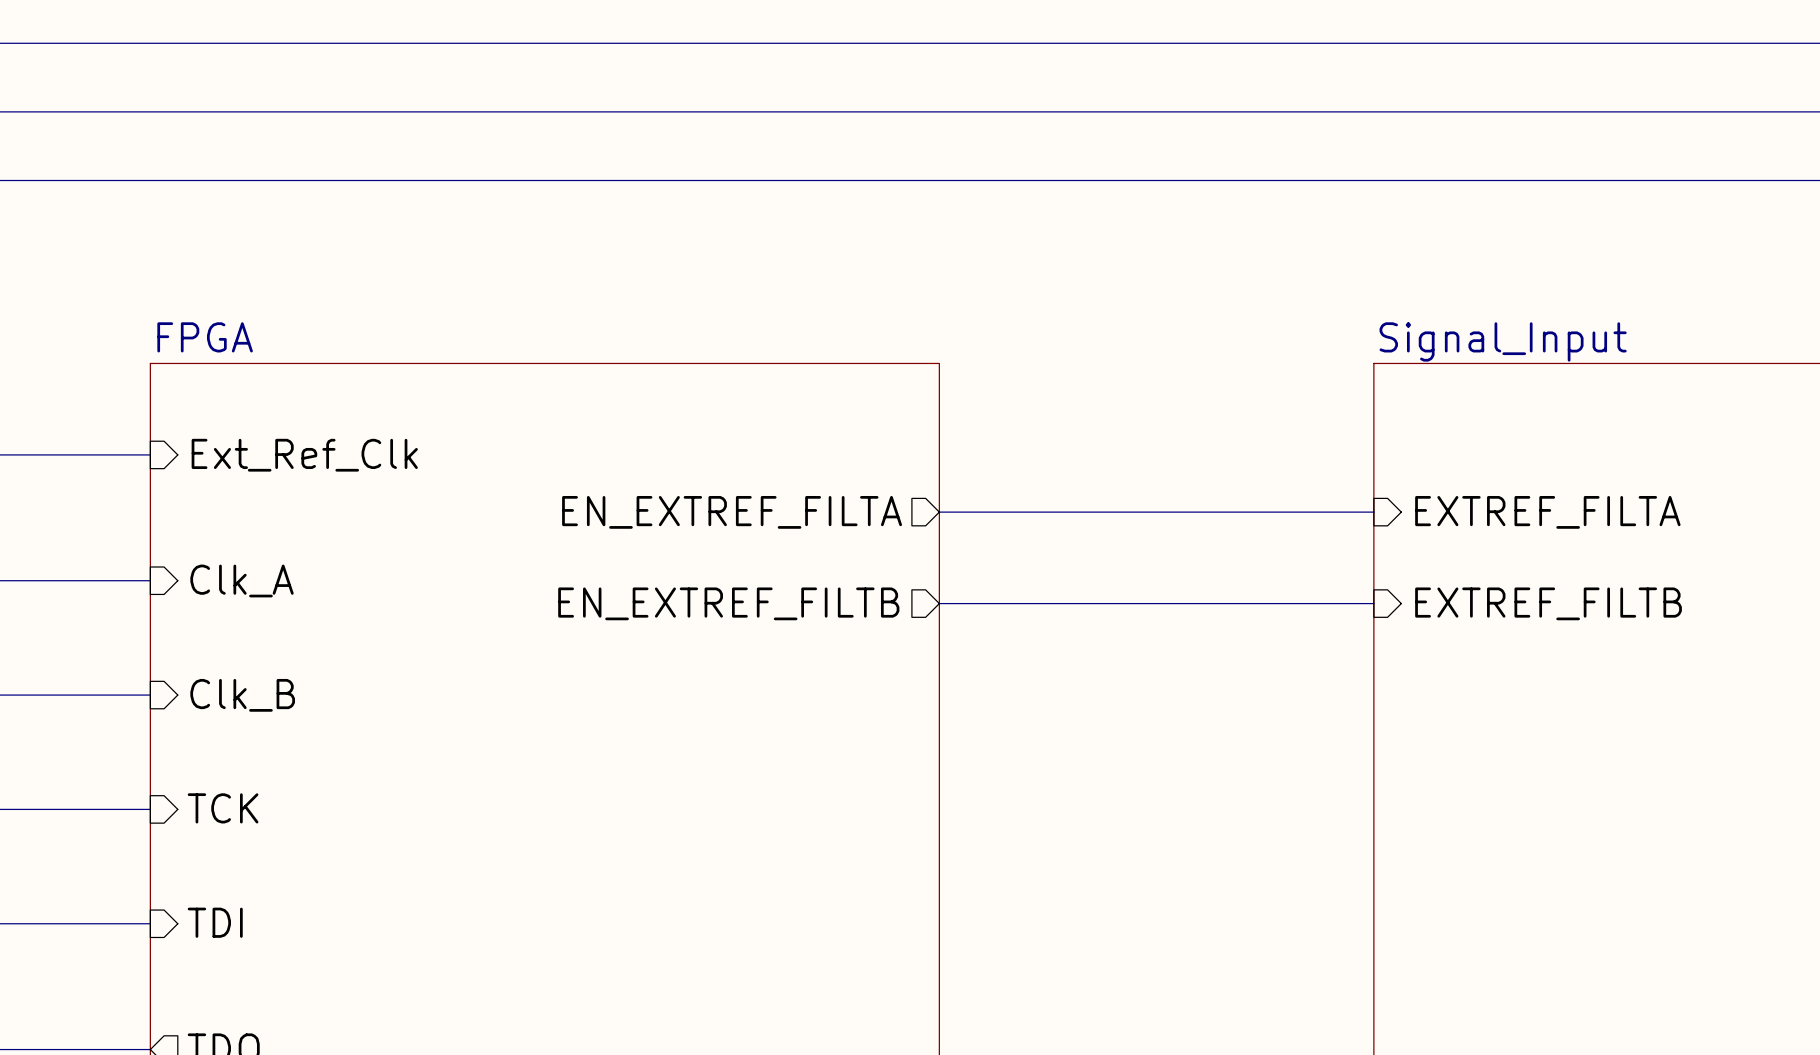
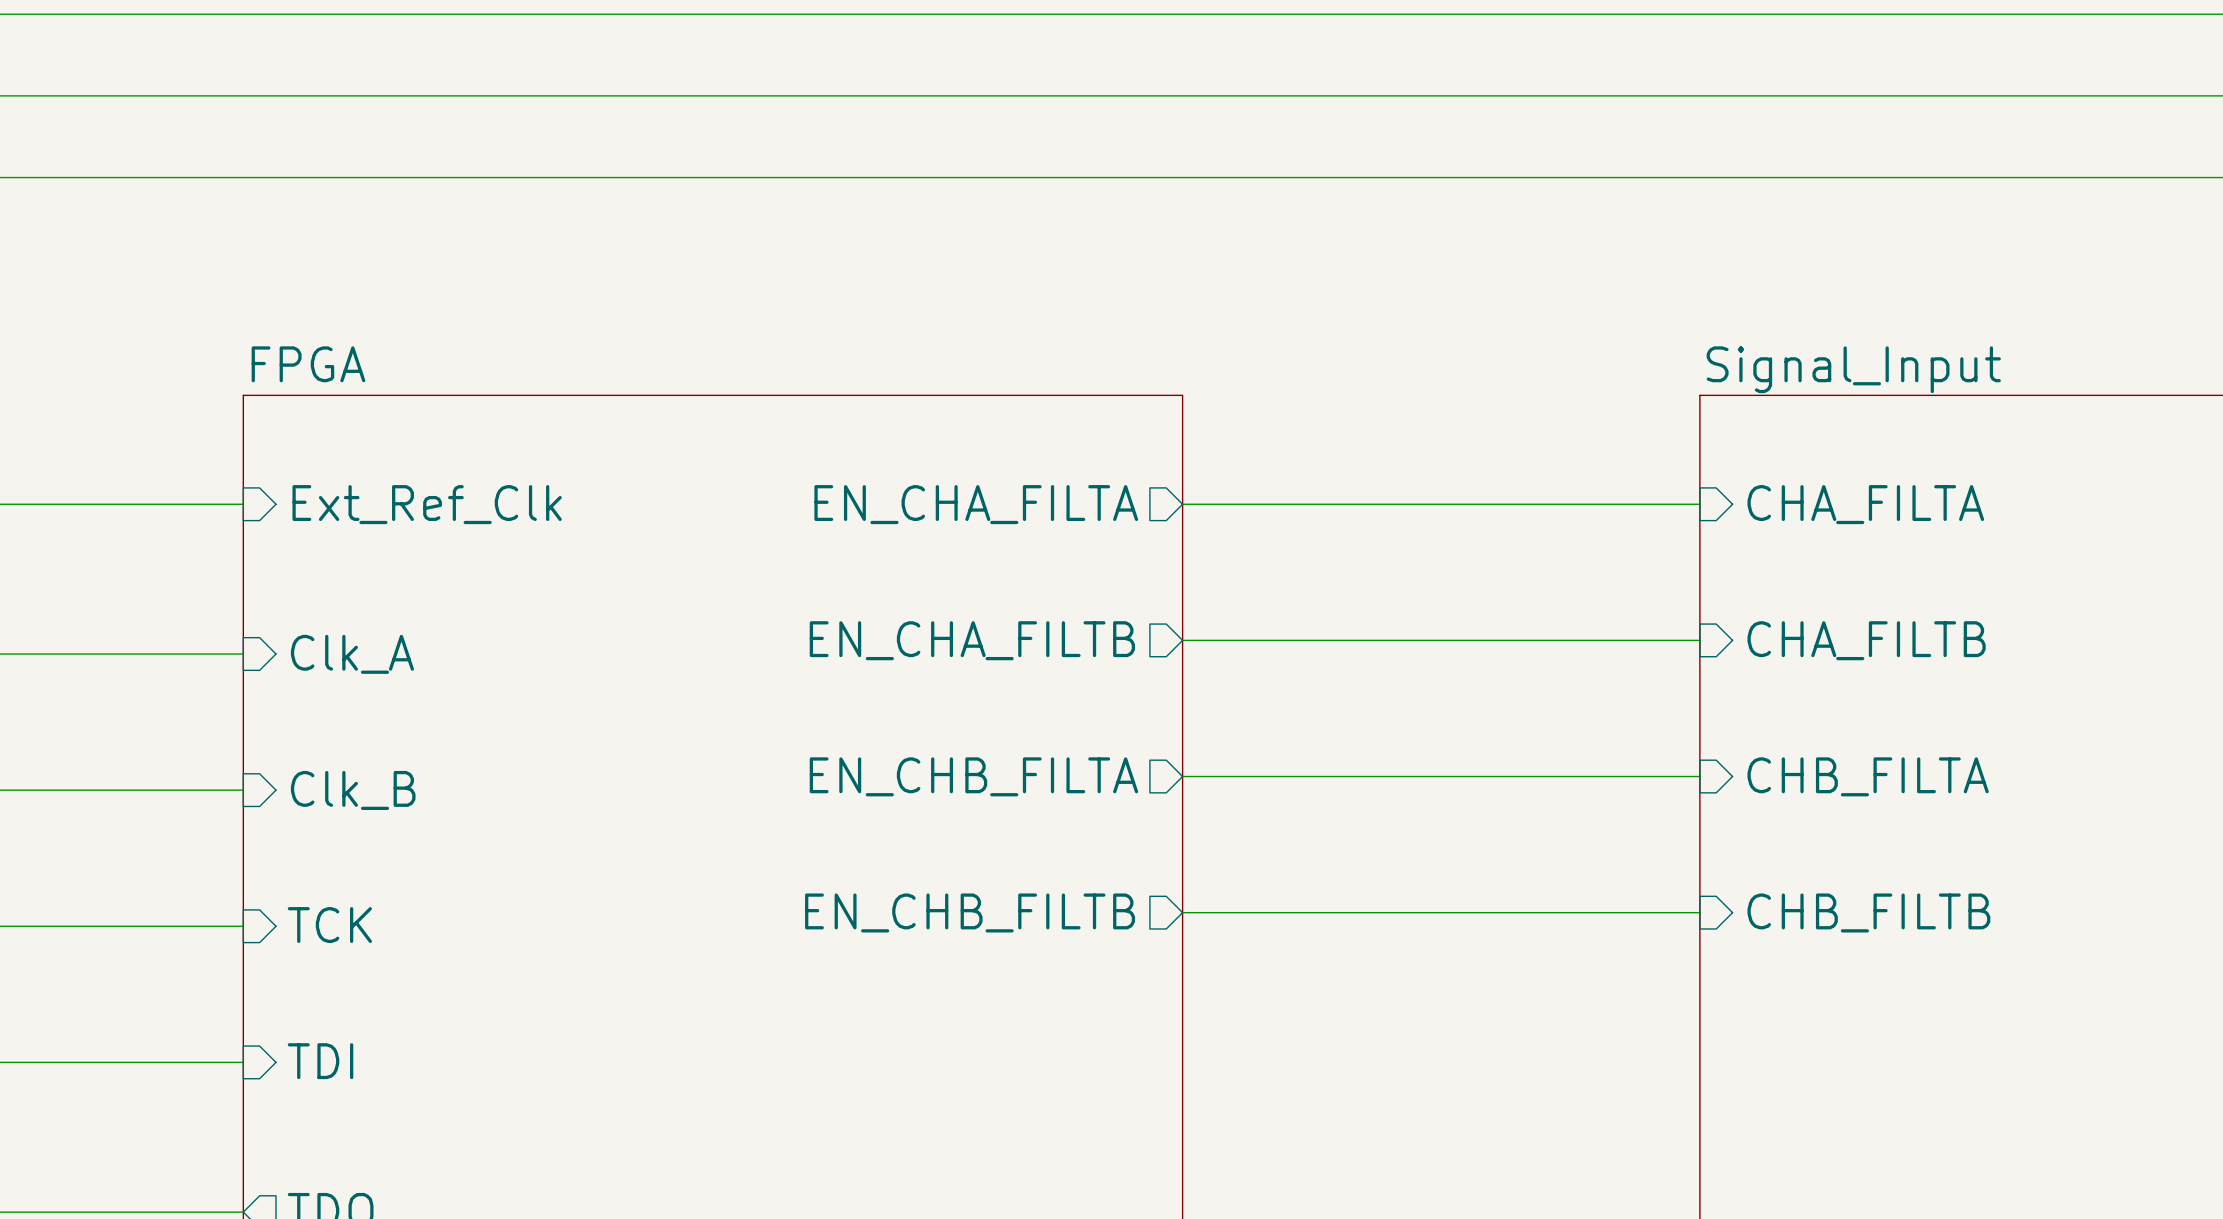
sheet pin: none -> CHA_FILTA (1865, 504)
sheet pin: EN_EXTREF_FILTA (732, 512) -> EN_CHA_FILTA (976, 504)
wire: (939, 512) (1373, 512) -> (1182, 504) (1699, 504)
sheet pin: EXTREF_FILTA (1547, 512) -> none
sheet pin: none -> CHA_FILTB (1866, 640)
sheet pin: EN_EXTREF_FILTB (728, 603) -> EN_CHA_FILTB (972, 640)
wire: (939, 603) (1373, 603) -> (1182, 640) (1699, 640)
sheet pin: EXTREF_FILTB (1548, 603) -> none
sheet pin: none -> EN_CHB_FILTA (973, 776)
wire: none -> (1182, 776) (1699, 776)
sheet pin: none -> CHB_FILTA (1868, 776)
wire: none -> (1182, 912) (1699, 912)
sheet pin: none -> EN_CHB_FILTB (970, 912)
sheet pin: none -> CHB_FILTB (1868, 912)

